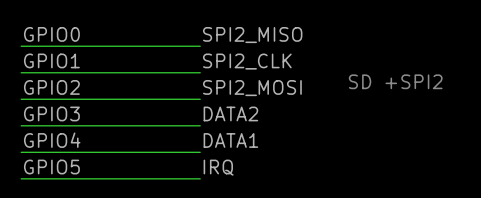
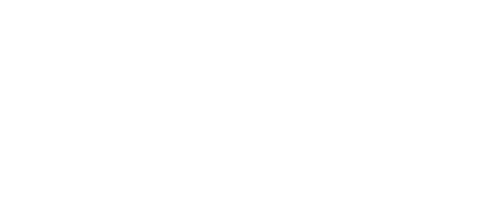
label: GPIO0 (51, 34) -> none
label: SPI2_MISO (252, 35) -> none
wire: (21, 46) (200, 46) -> none
label: GPIO1 (51, 60) -> none
label: SPI2_CLK (247, 61) -> none
wire: (21, 72) (200, 72) -> none
text: SD +SPI2 (395, 81) -> none
label: GPIO2 (51, 87) -> none
label: SPI2_MOSI (252, 88) -> none
wire: (21, 99) (200, 99) -> none
label: GPIO3 (51, 113) -> none
label: DATA2 (230, 113) -> none
wire: (21, 125) (200, 125) -> none
label: GPIO4 (52, 140) -> none
label: DATA1 (230, 140) -> none
wire: (21, 152) (200, 152) -> none
label: GPIO5 (51, 167) -> none
label: IRQ (218, 167) -> none
wire: (21, 178) (200, 178) -> none

